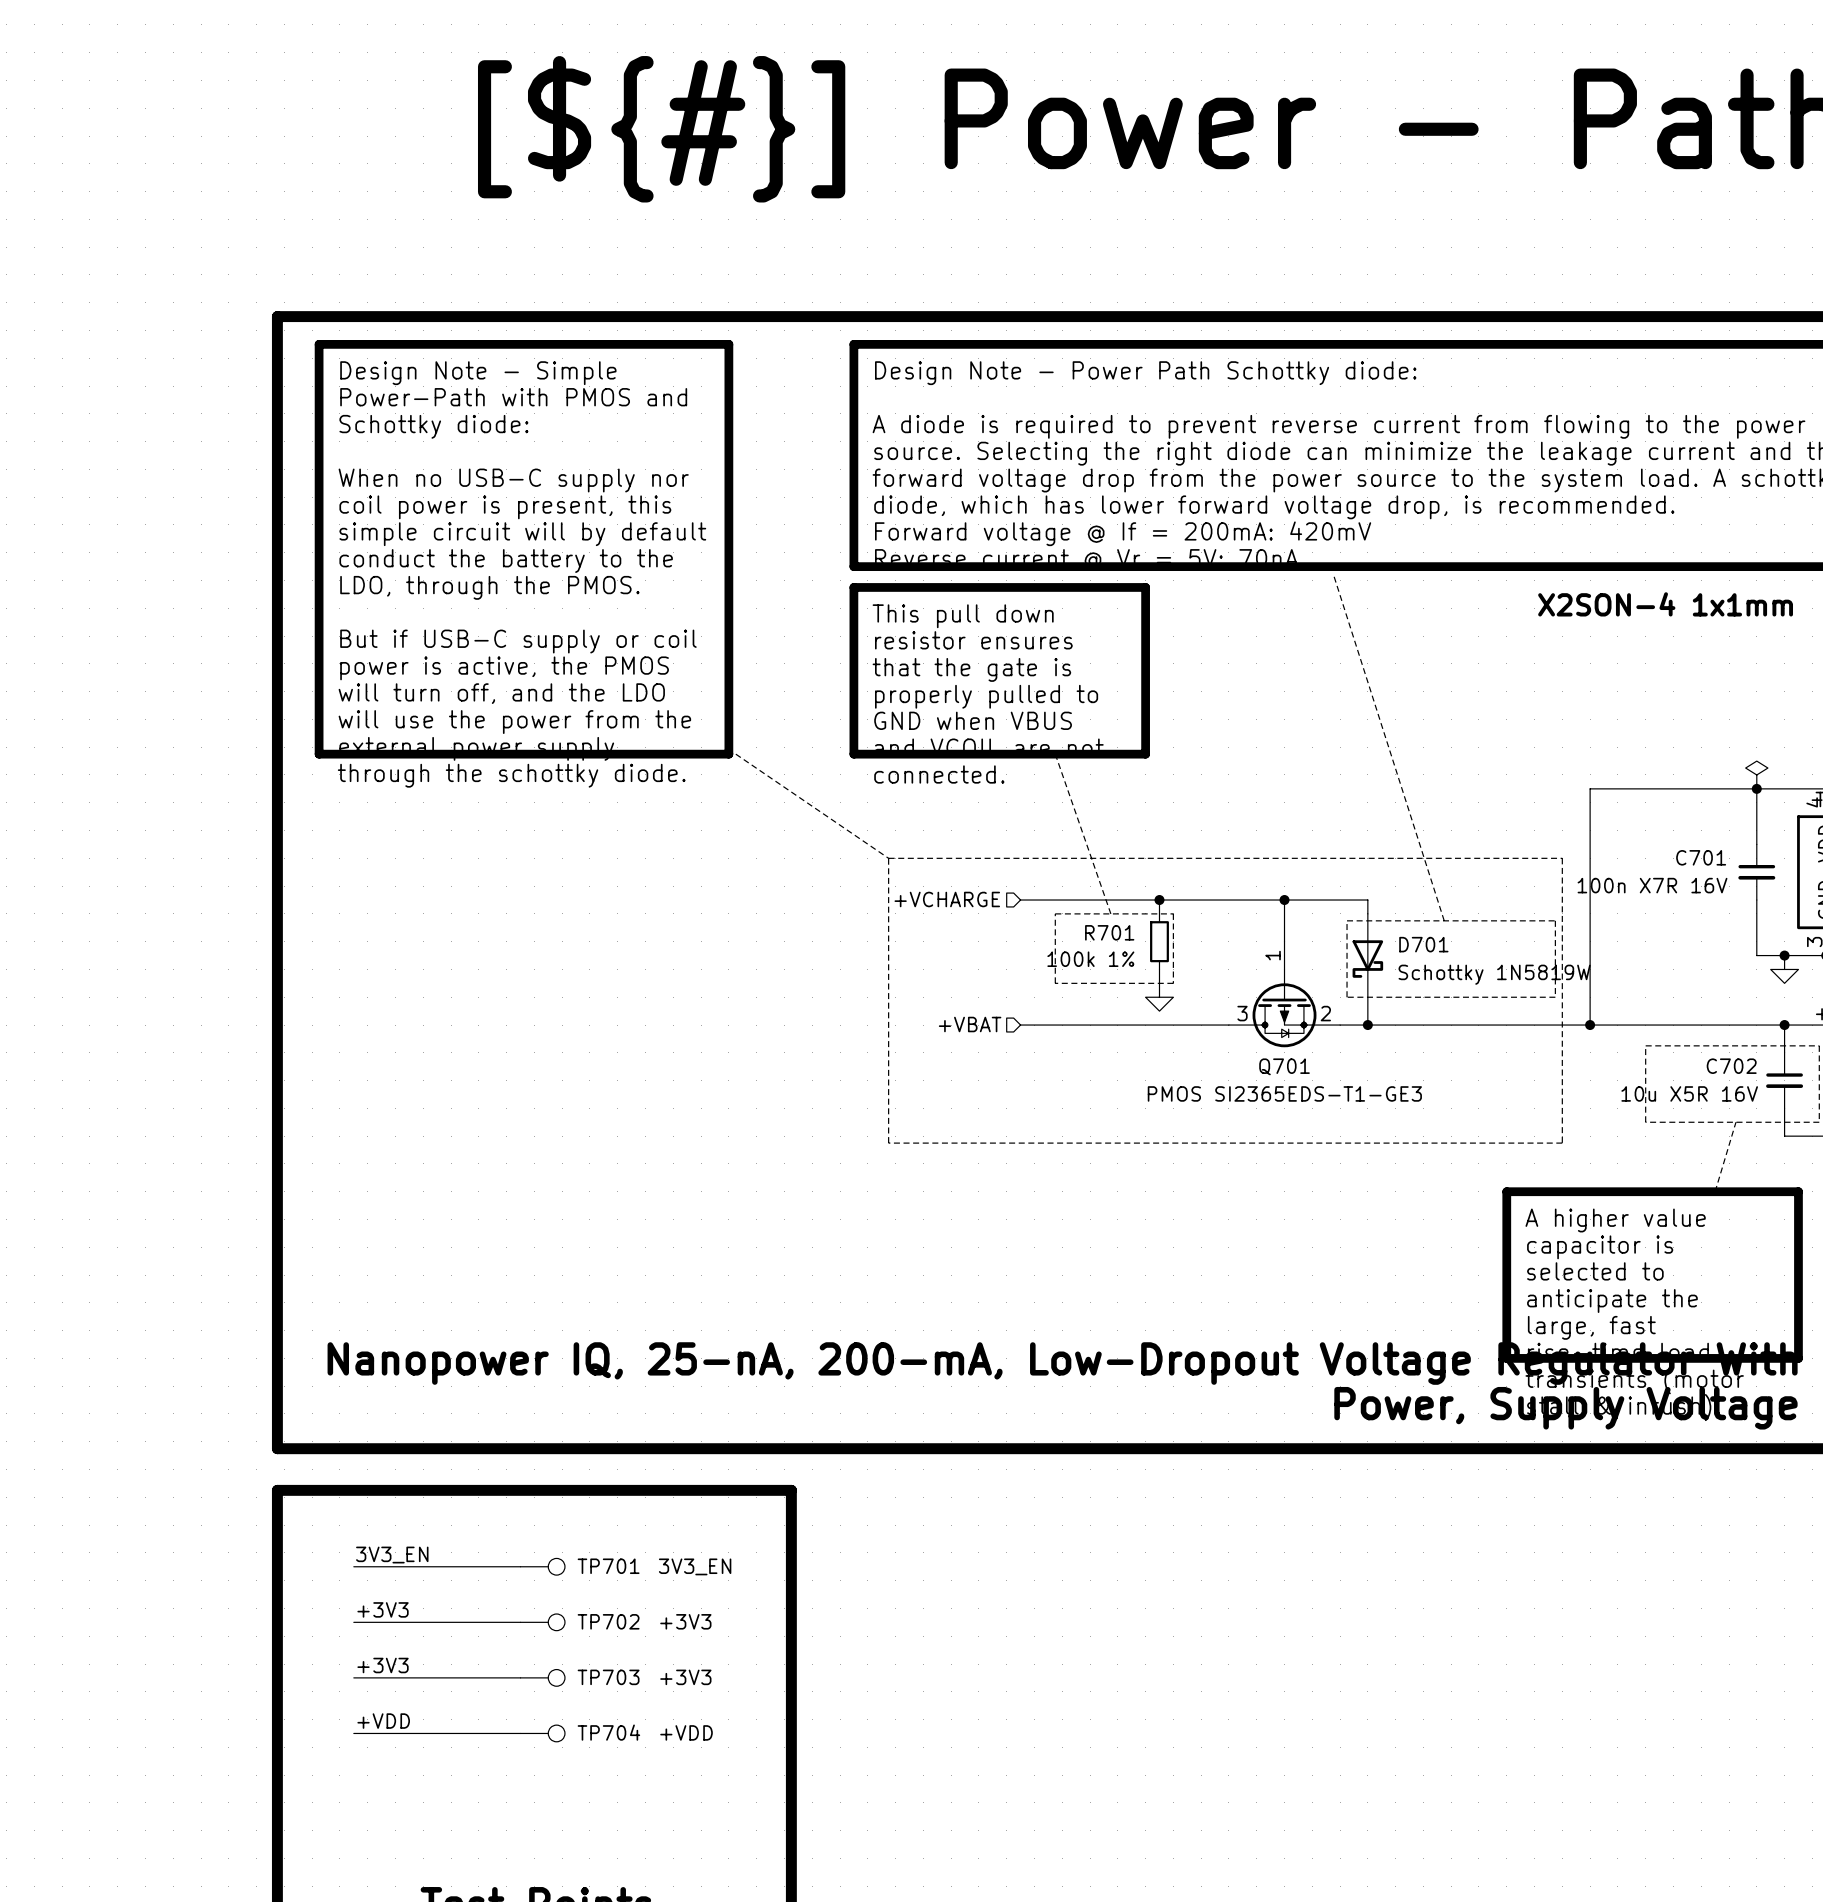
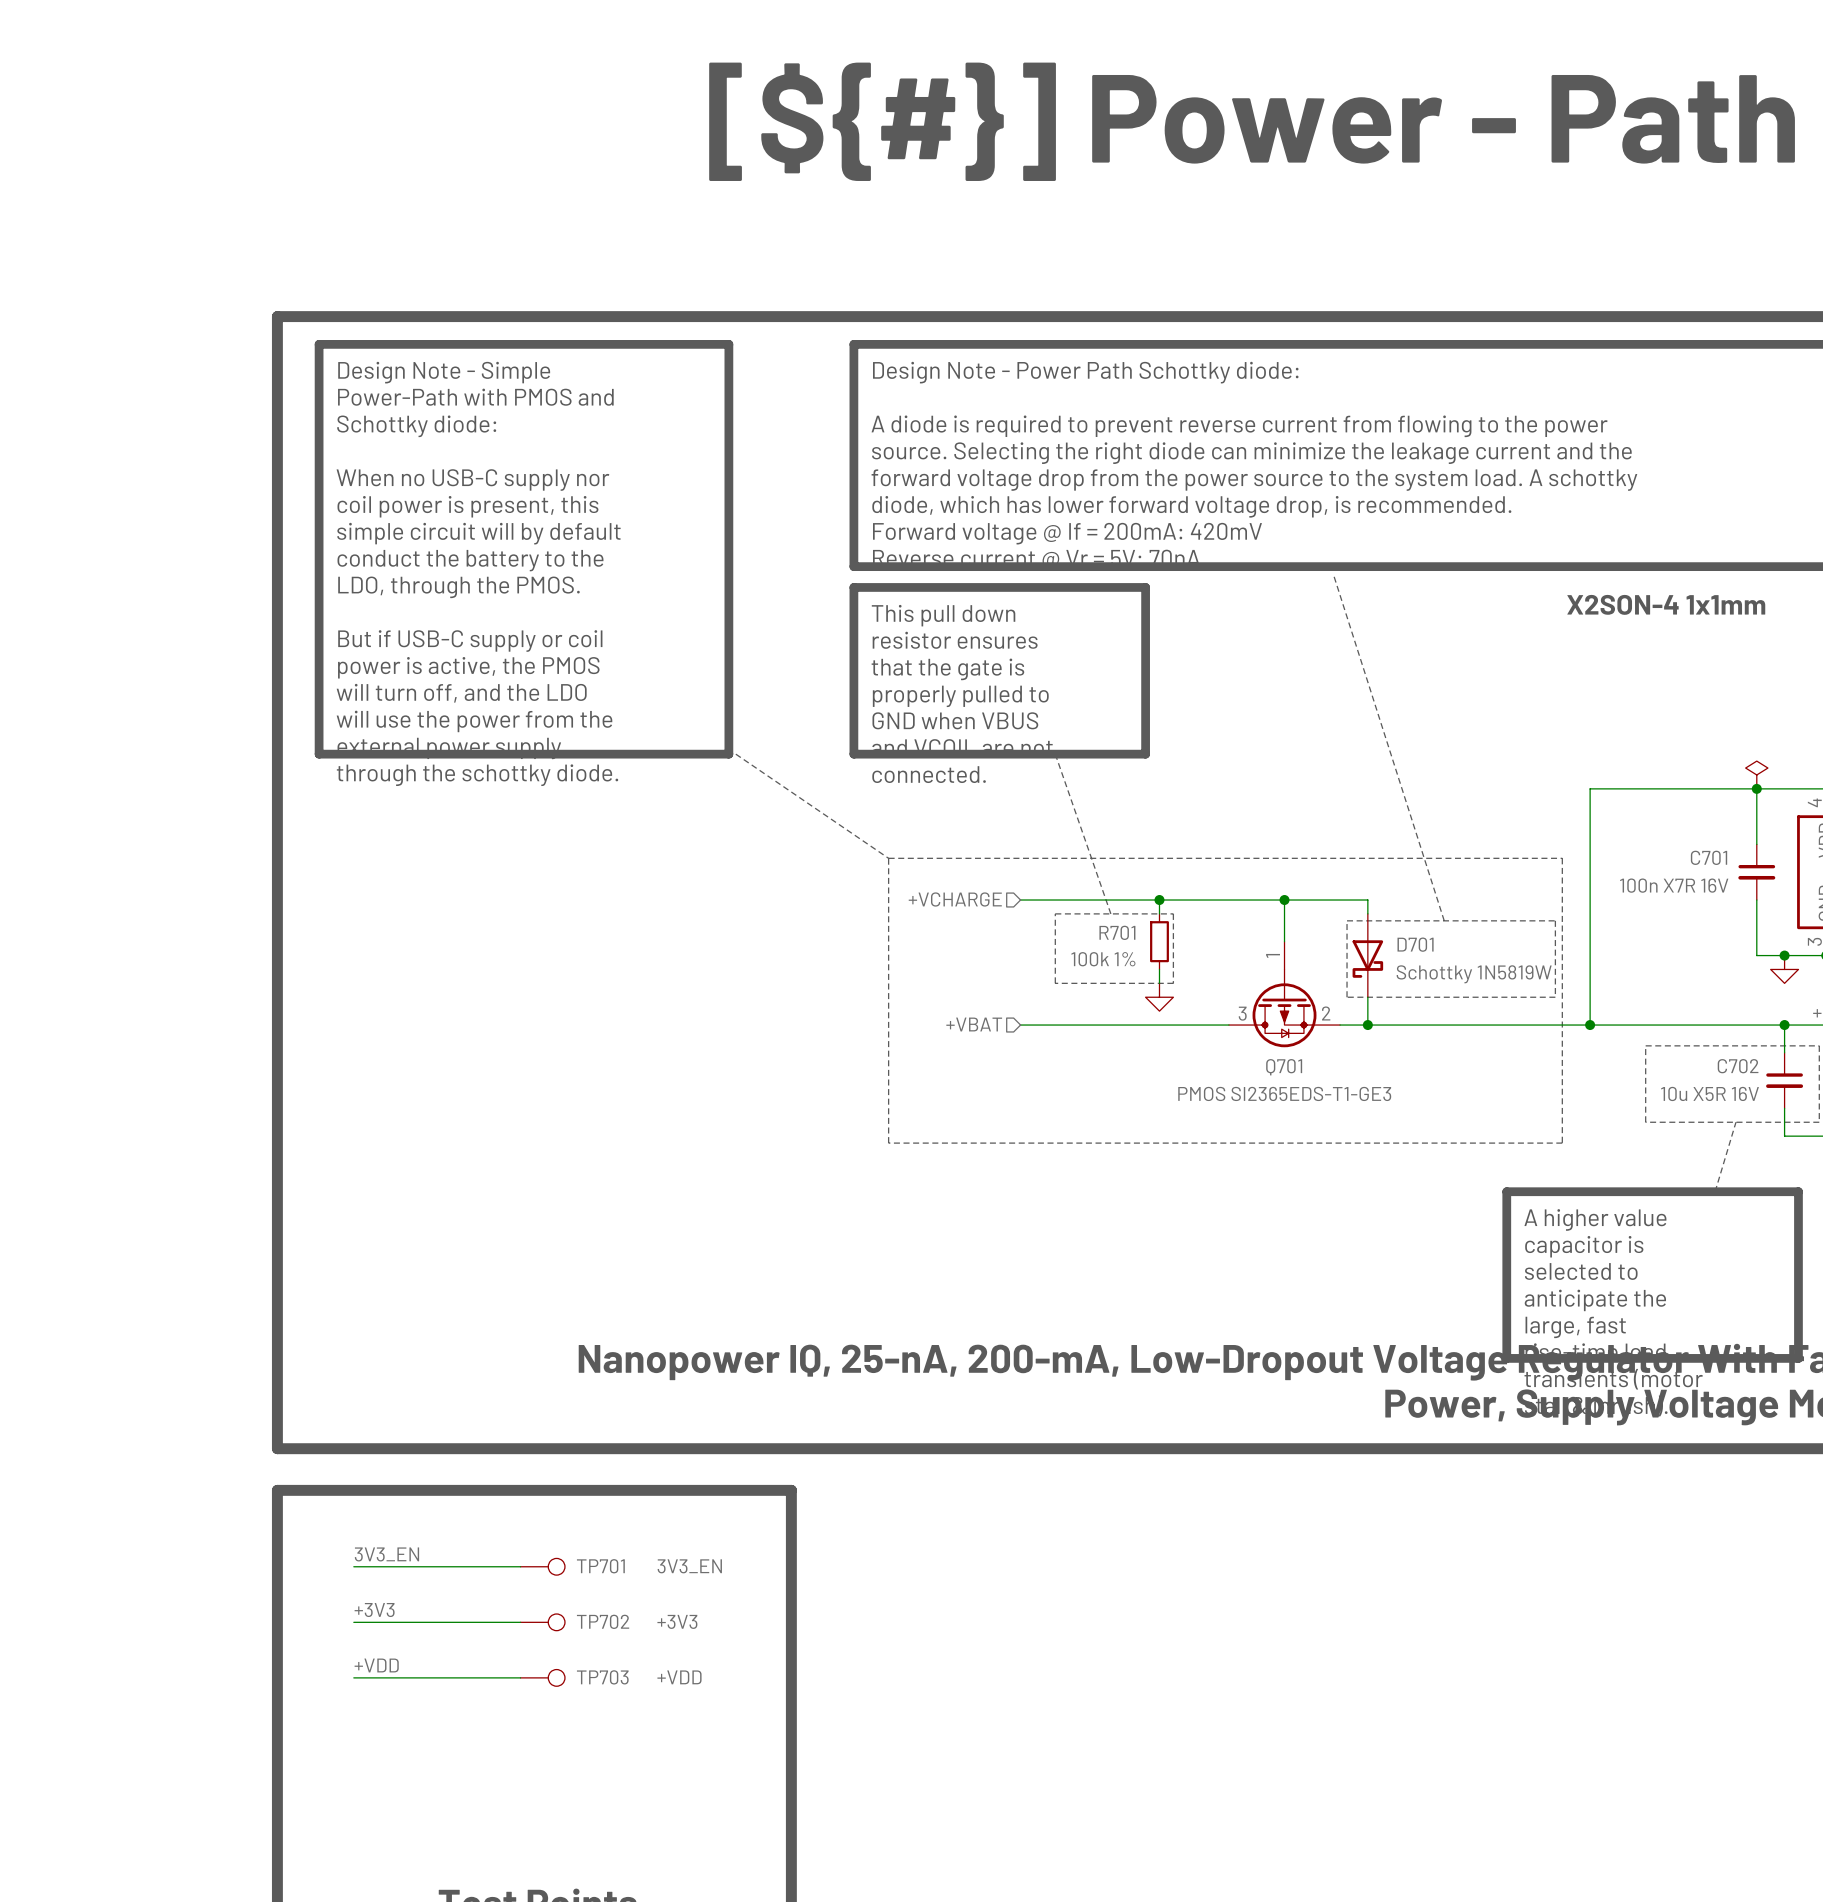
label: +3V3 (383, 1665) -> +VDD (376, 1665)
TP703 value: +3V3 (685, 1677) -> +VDD (679, 1677)
label: +VDD (383, 1721) -> none
wire: (353, 1733) (520, 1733) -> none
TP704: +VDD (542, 1733) -> none

